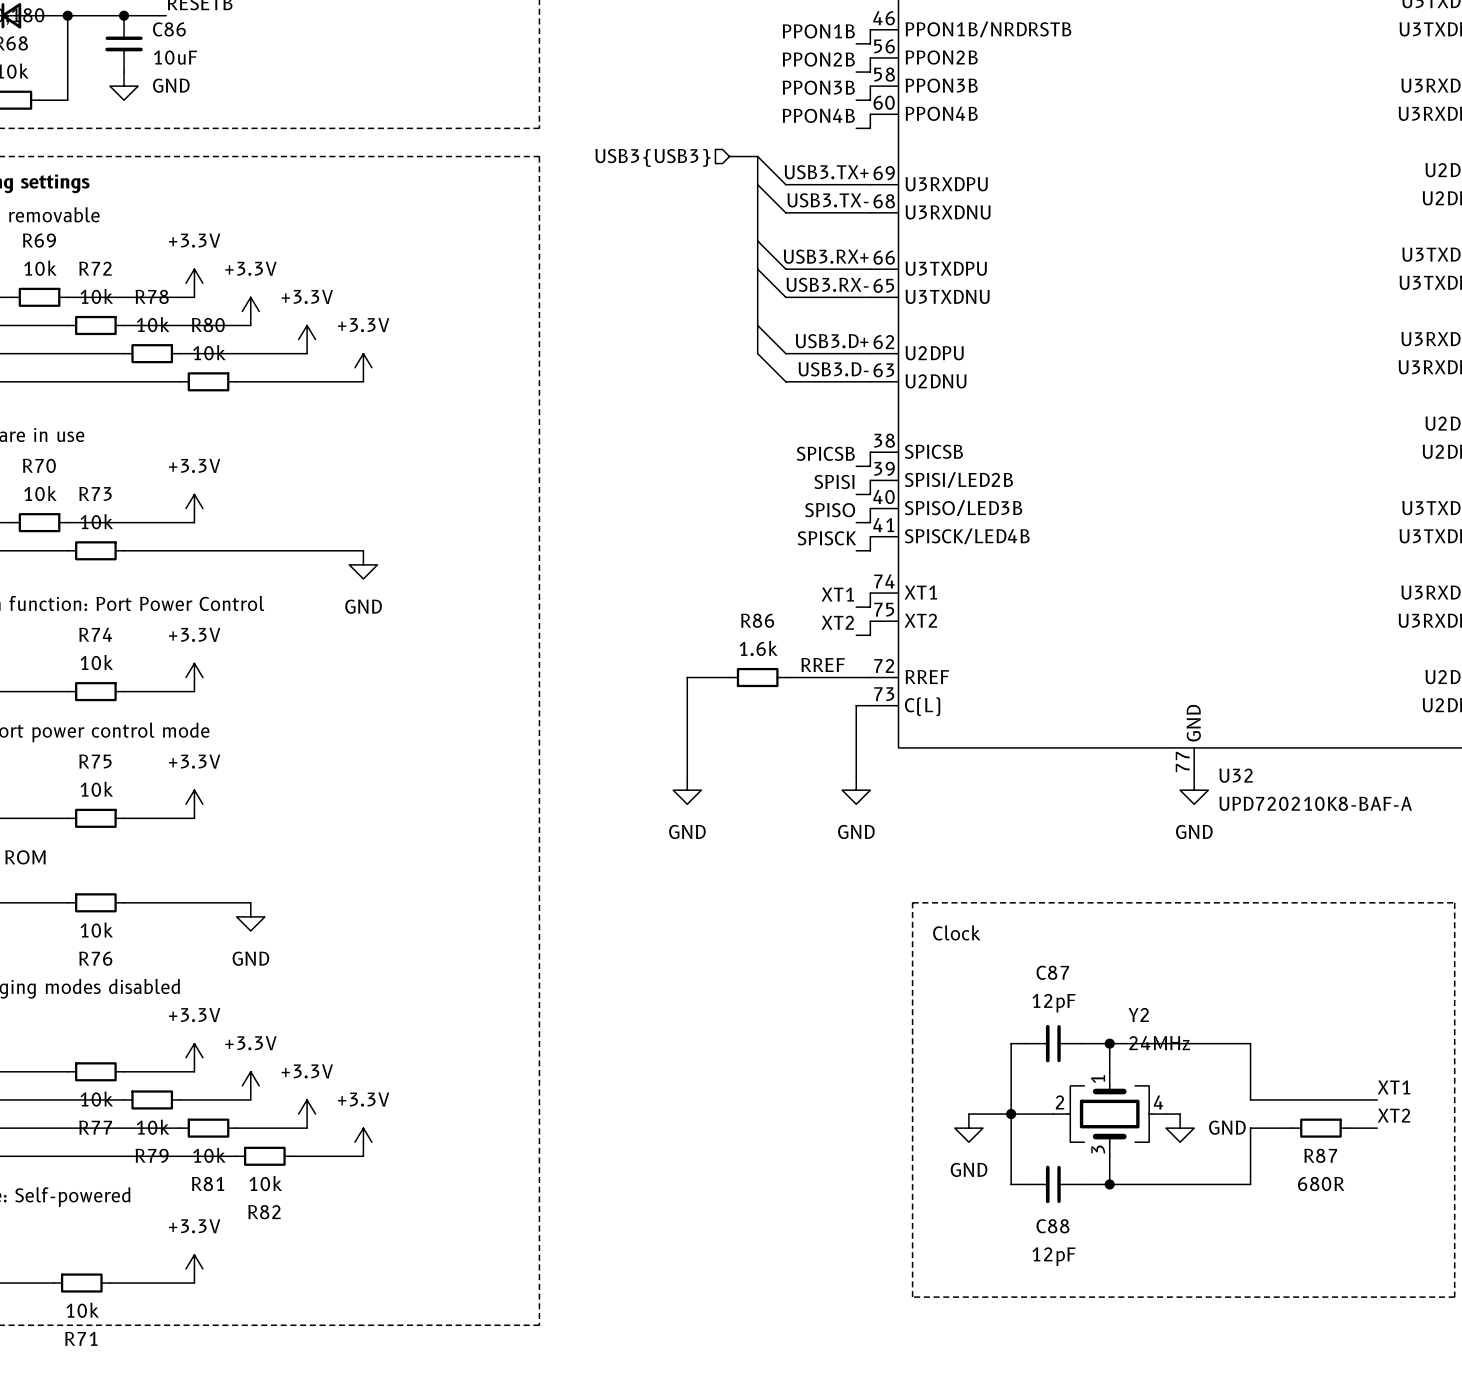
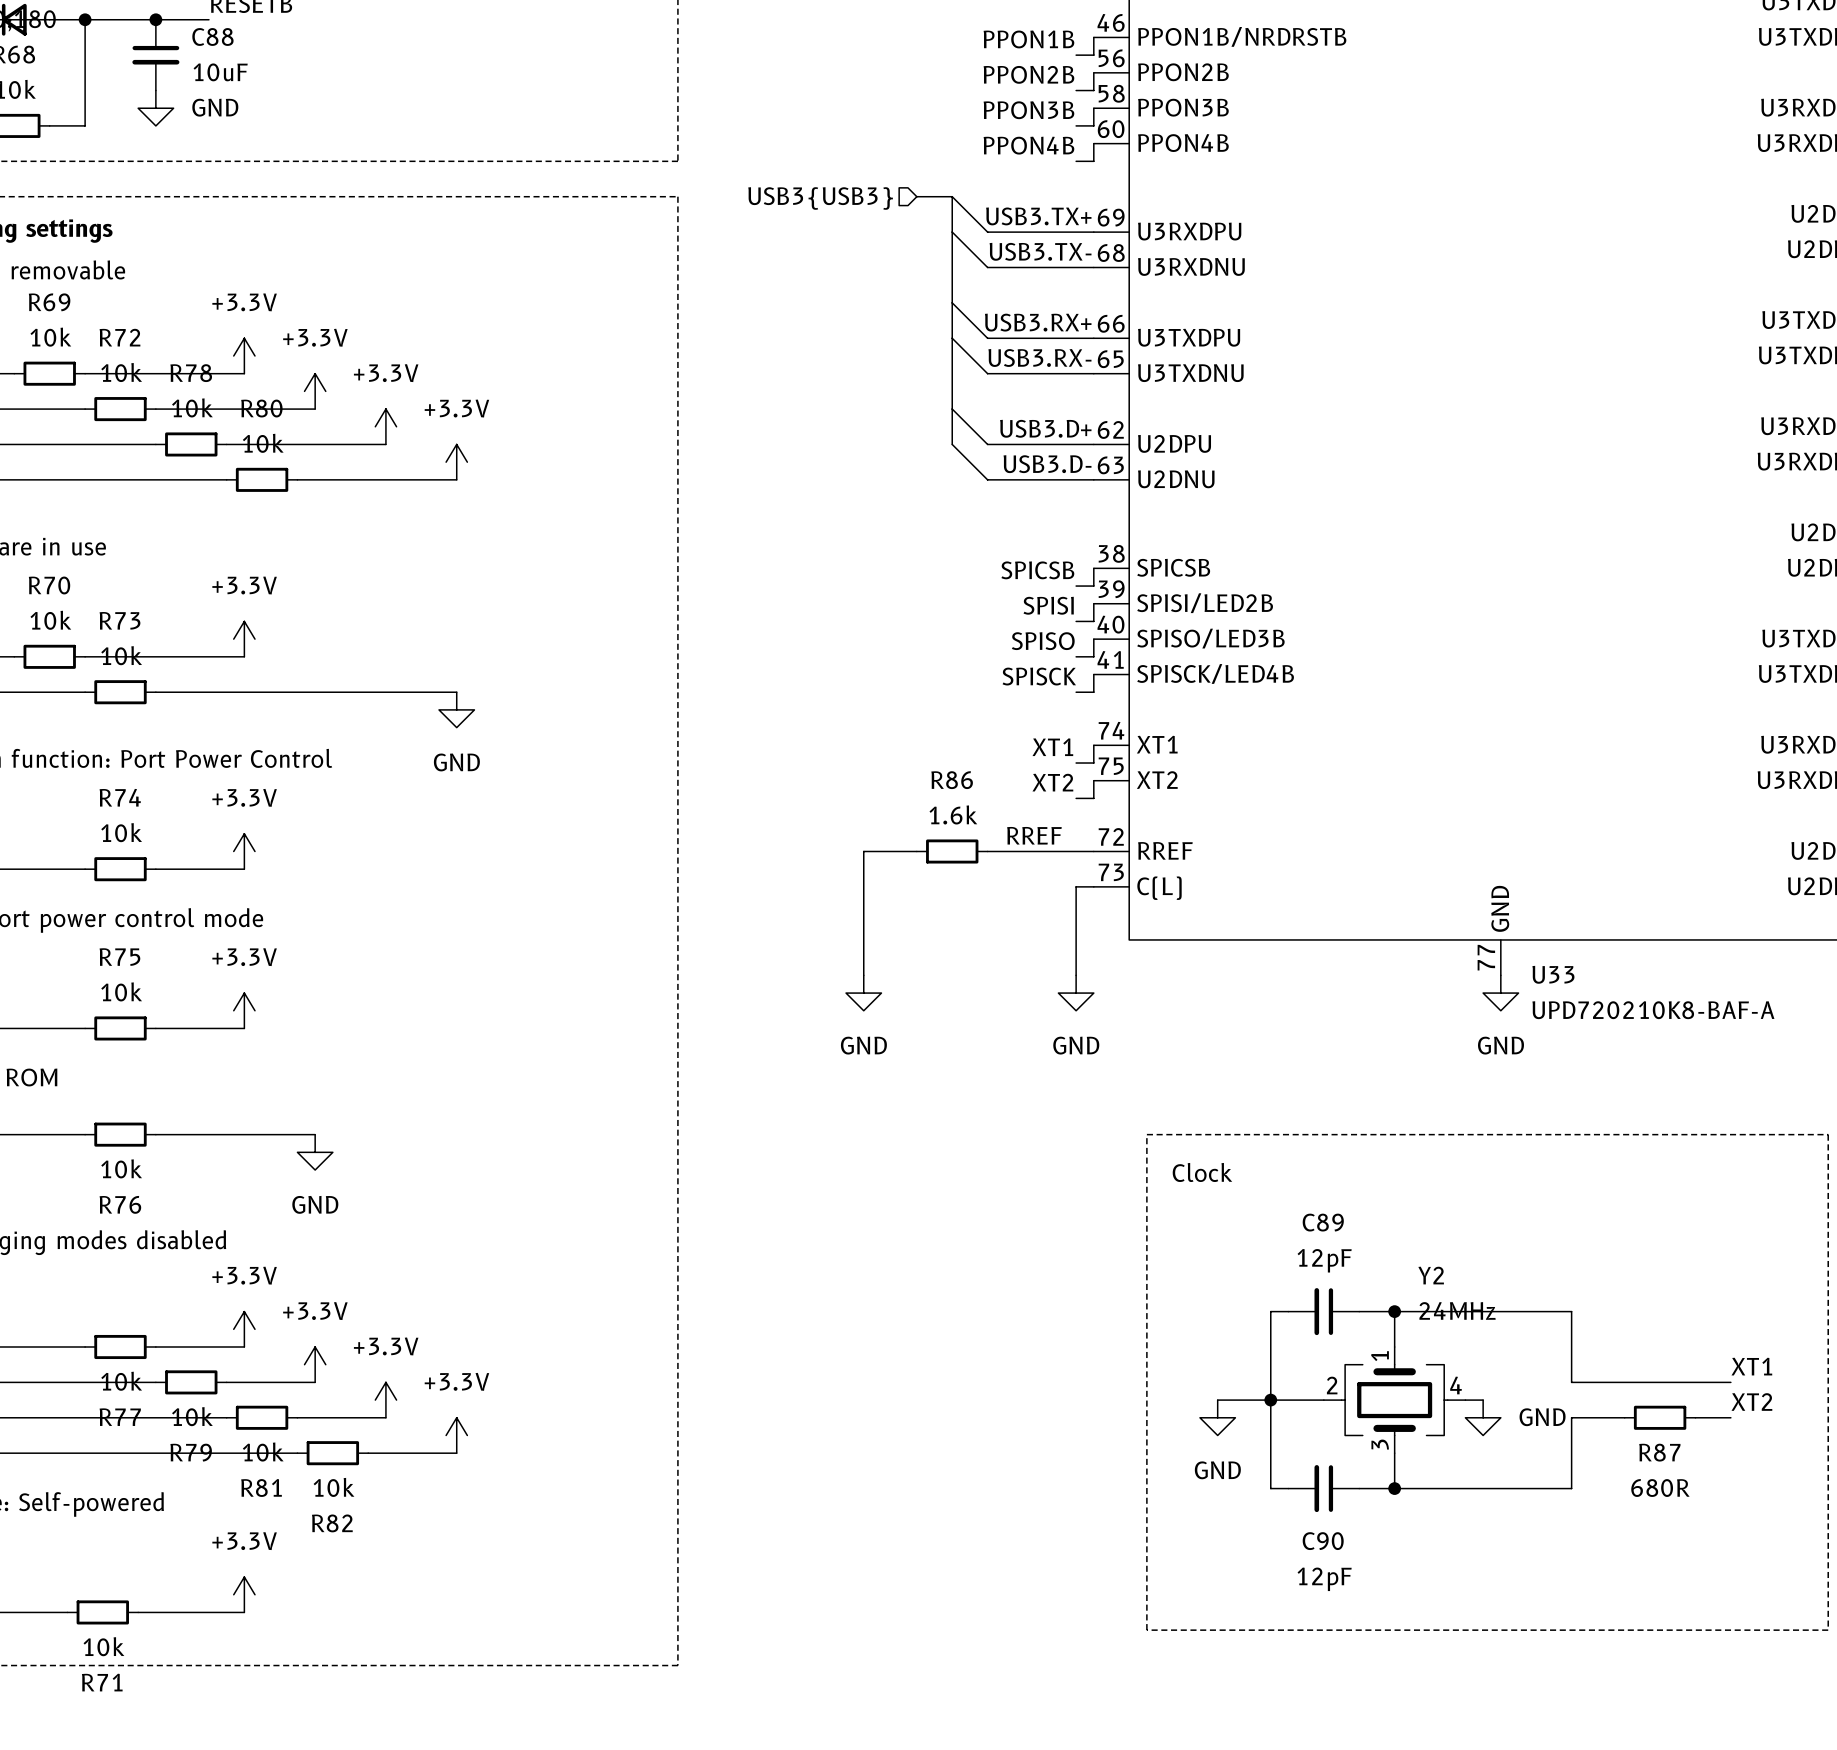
C86 name: C86 (169, 29) -> C88 (212, 36)
U32 name: U32 (1236, 775) -> U33 (1553, 974)
C87 name: C87 (1052, 972) -> C89 (1323, 1222)
C88 name: C88 (1052, 1226) -> C90 (1323, 1541)

